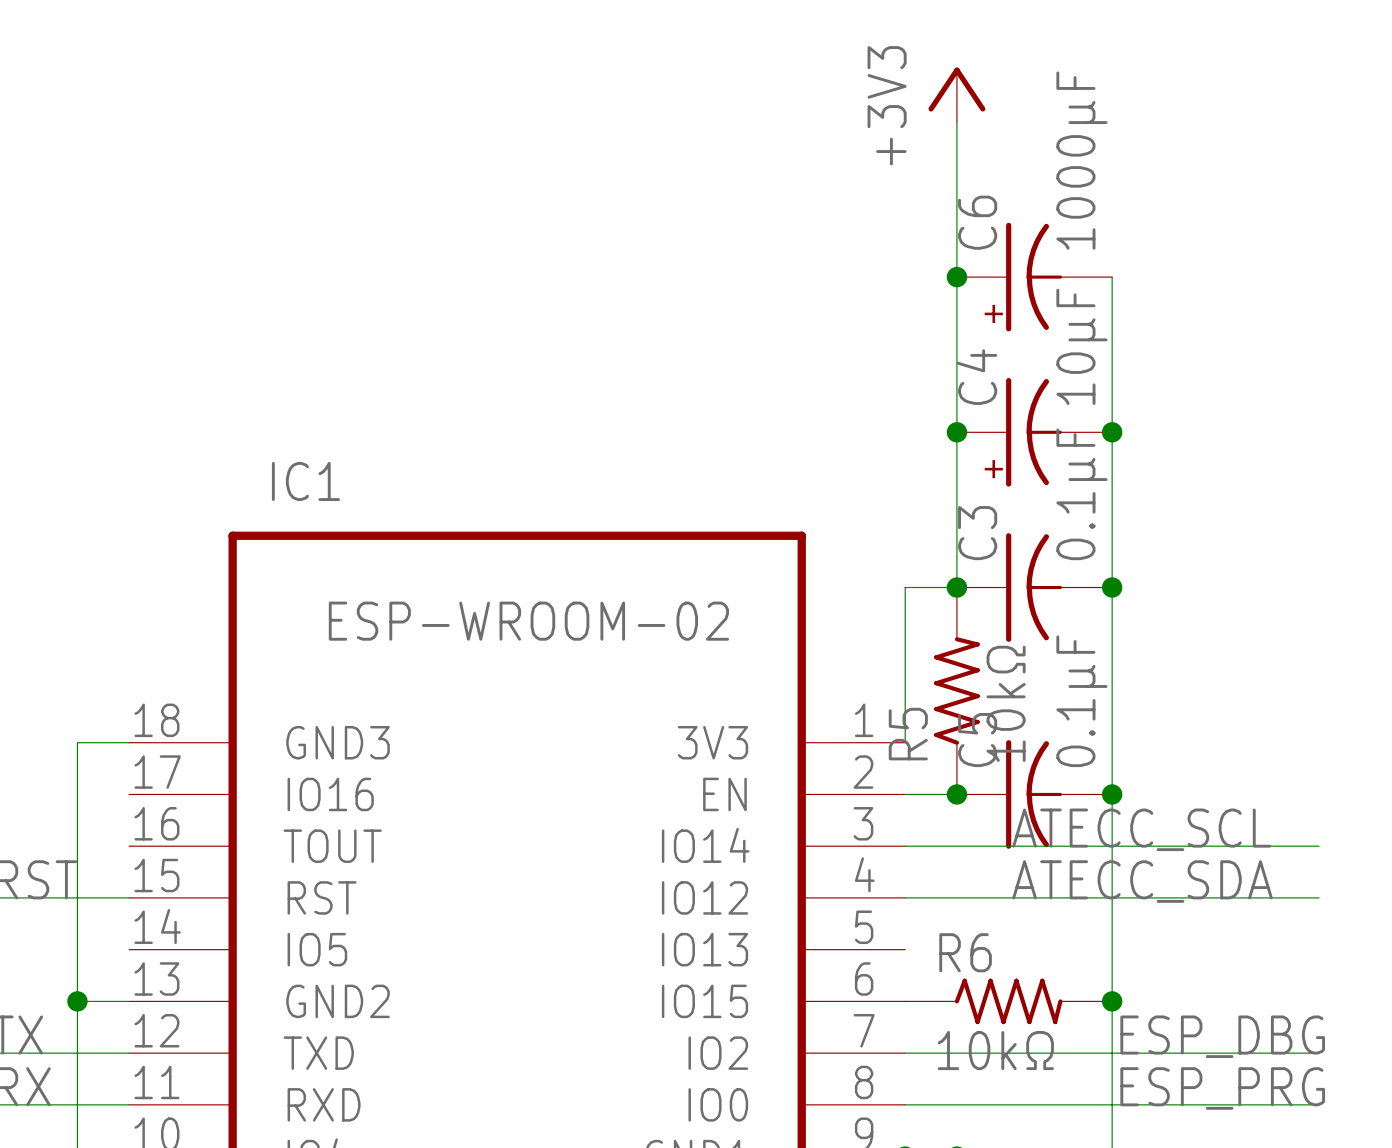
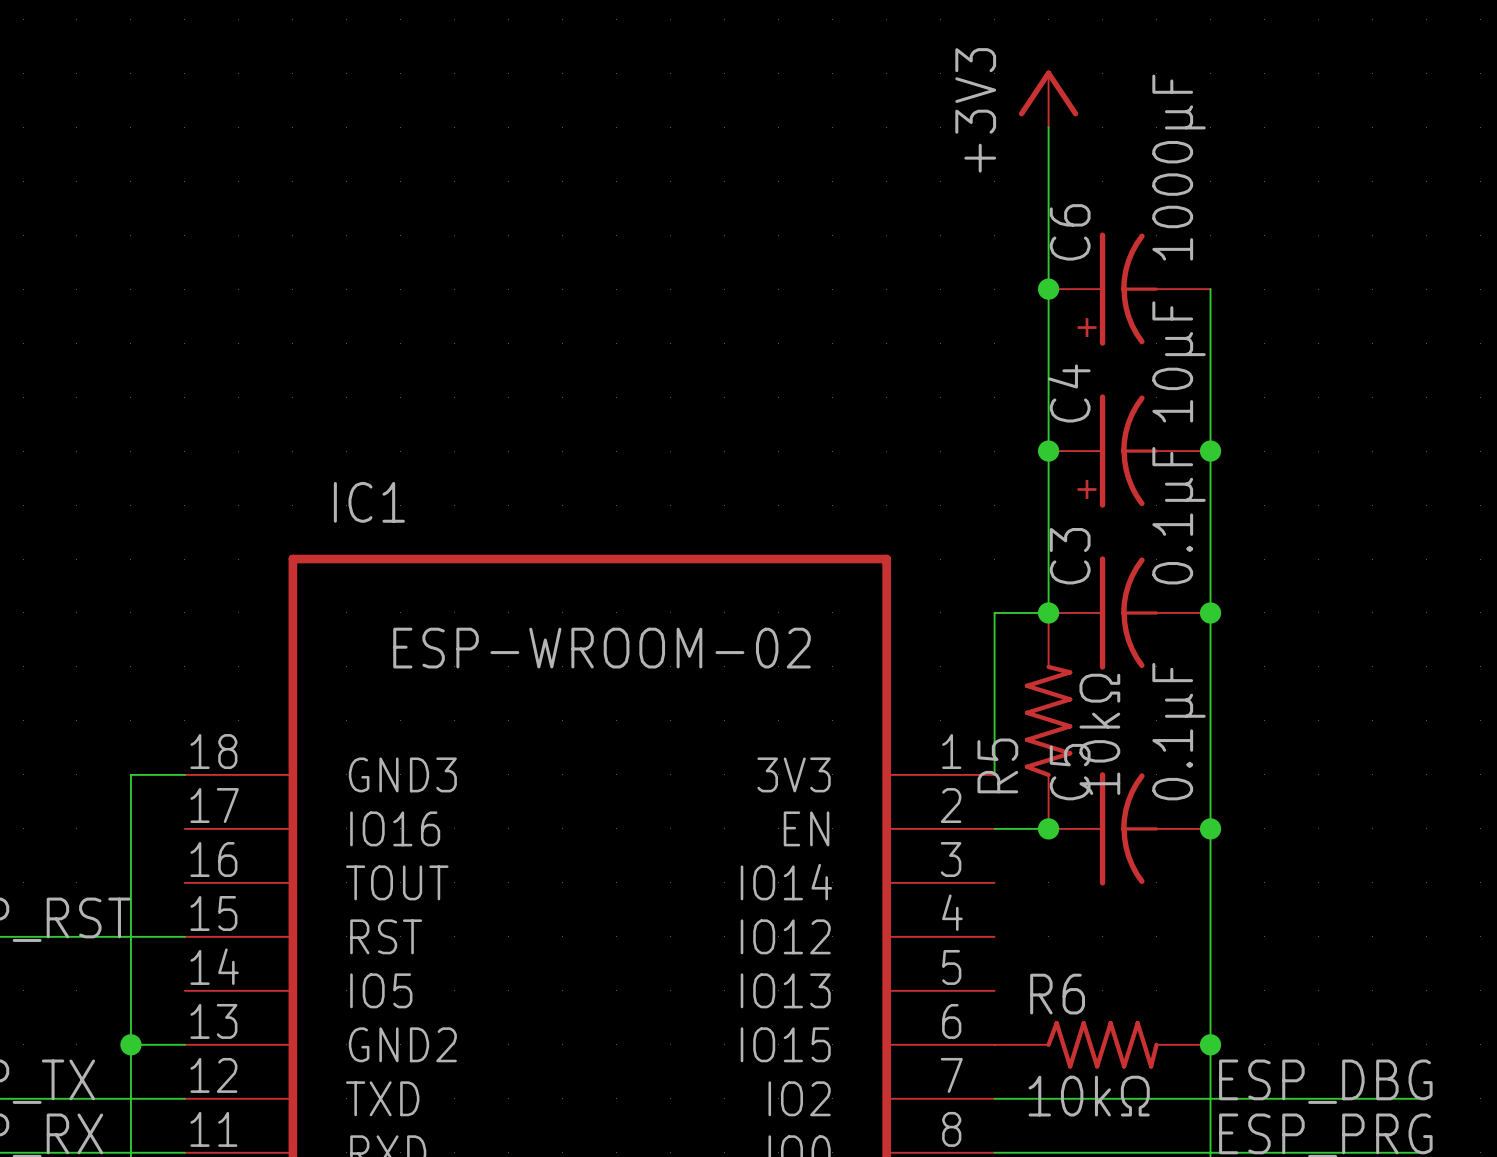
label: ATECC_SCL (1141, 829) -> none
wire: (905, 846) (1319, 846) -> none
label: ATECC_SDA (1142, 881) -> none
wire: (905, 897) (1319, 897) -> none

